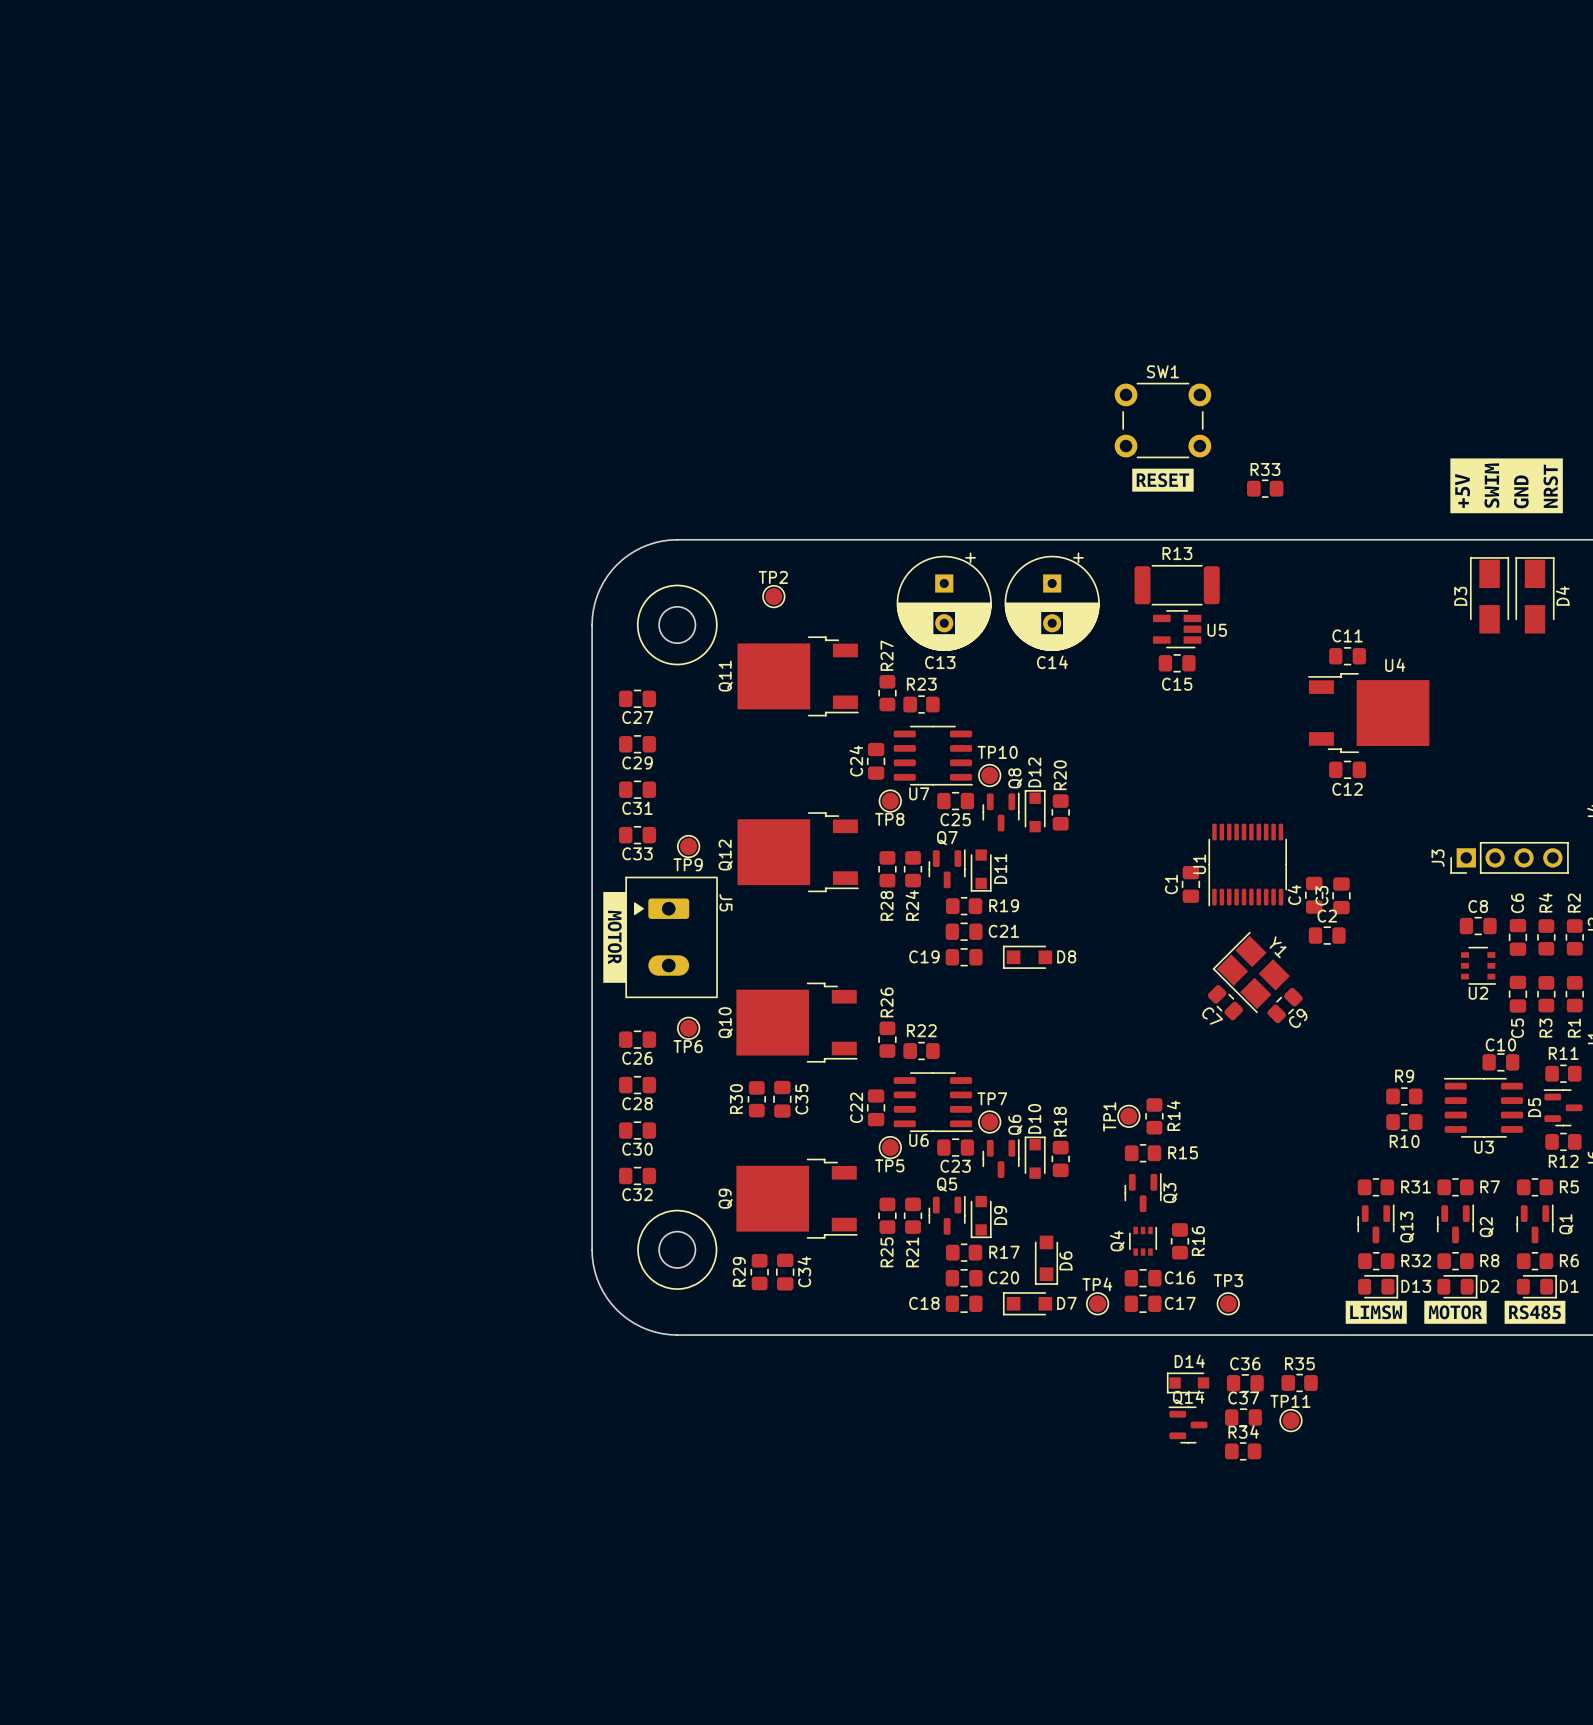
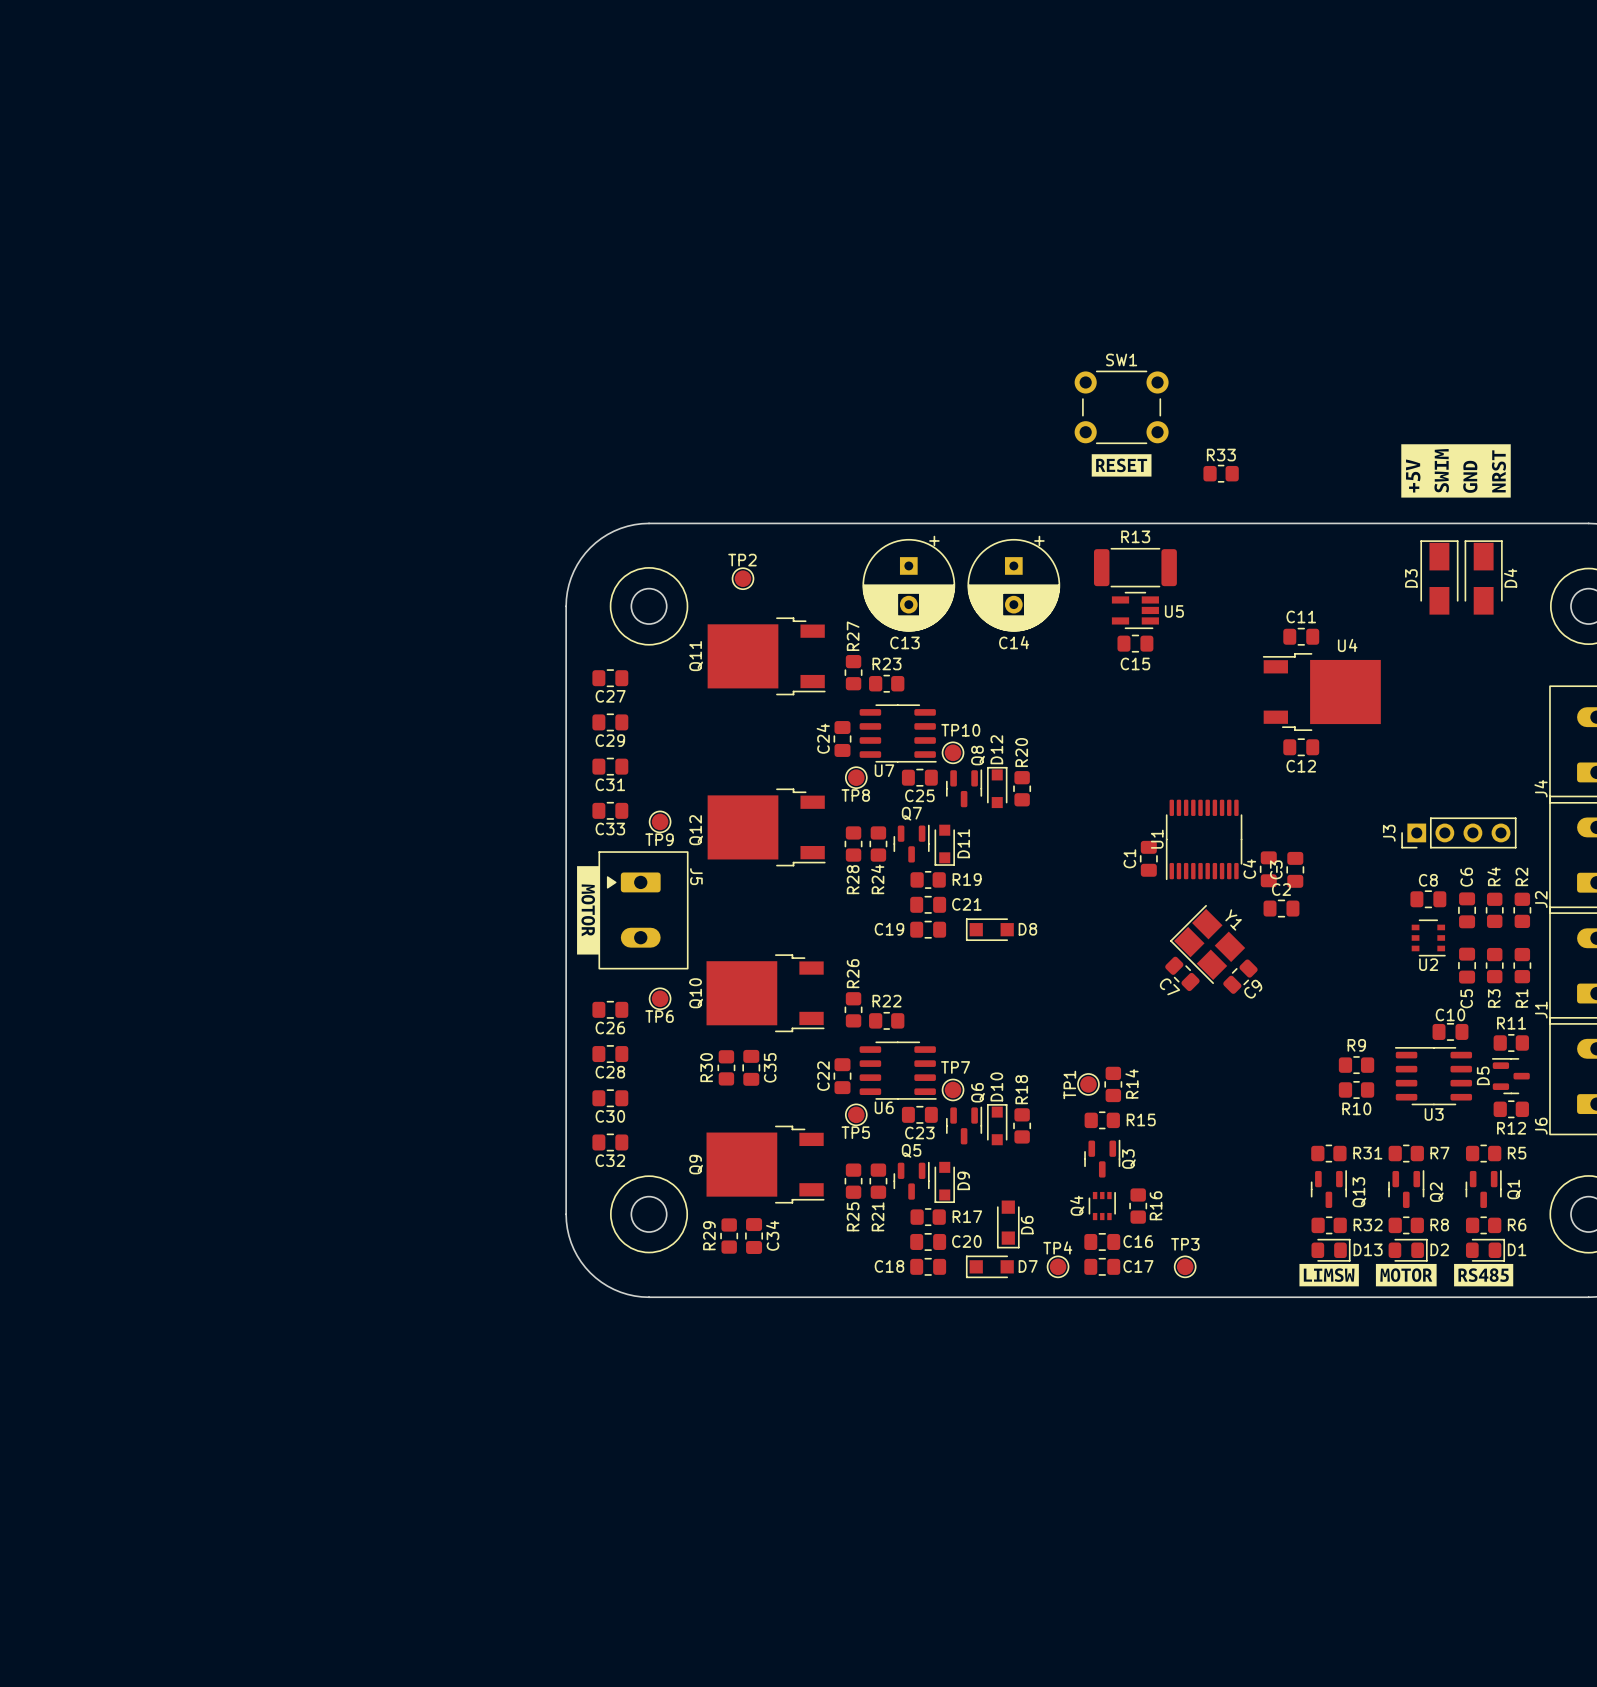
D14: (1188, 1382) -> none
R35: (1299, 1382) -> none
C36: (1245, 1383) -> none
C37: (1243, 1417) -> none
TP11: (1290, 1420) -> none
Q14: (1188, 1425) -> none
R34: (1243, 1451) -> none

